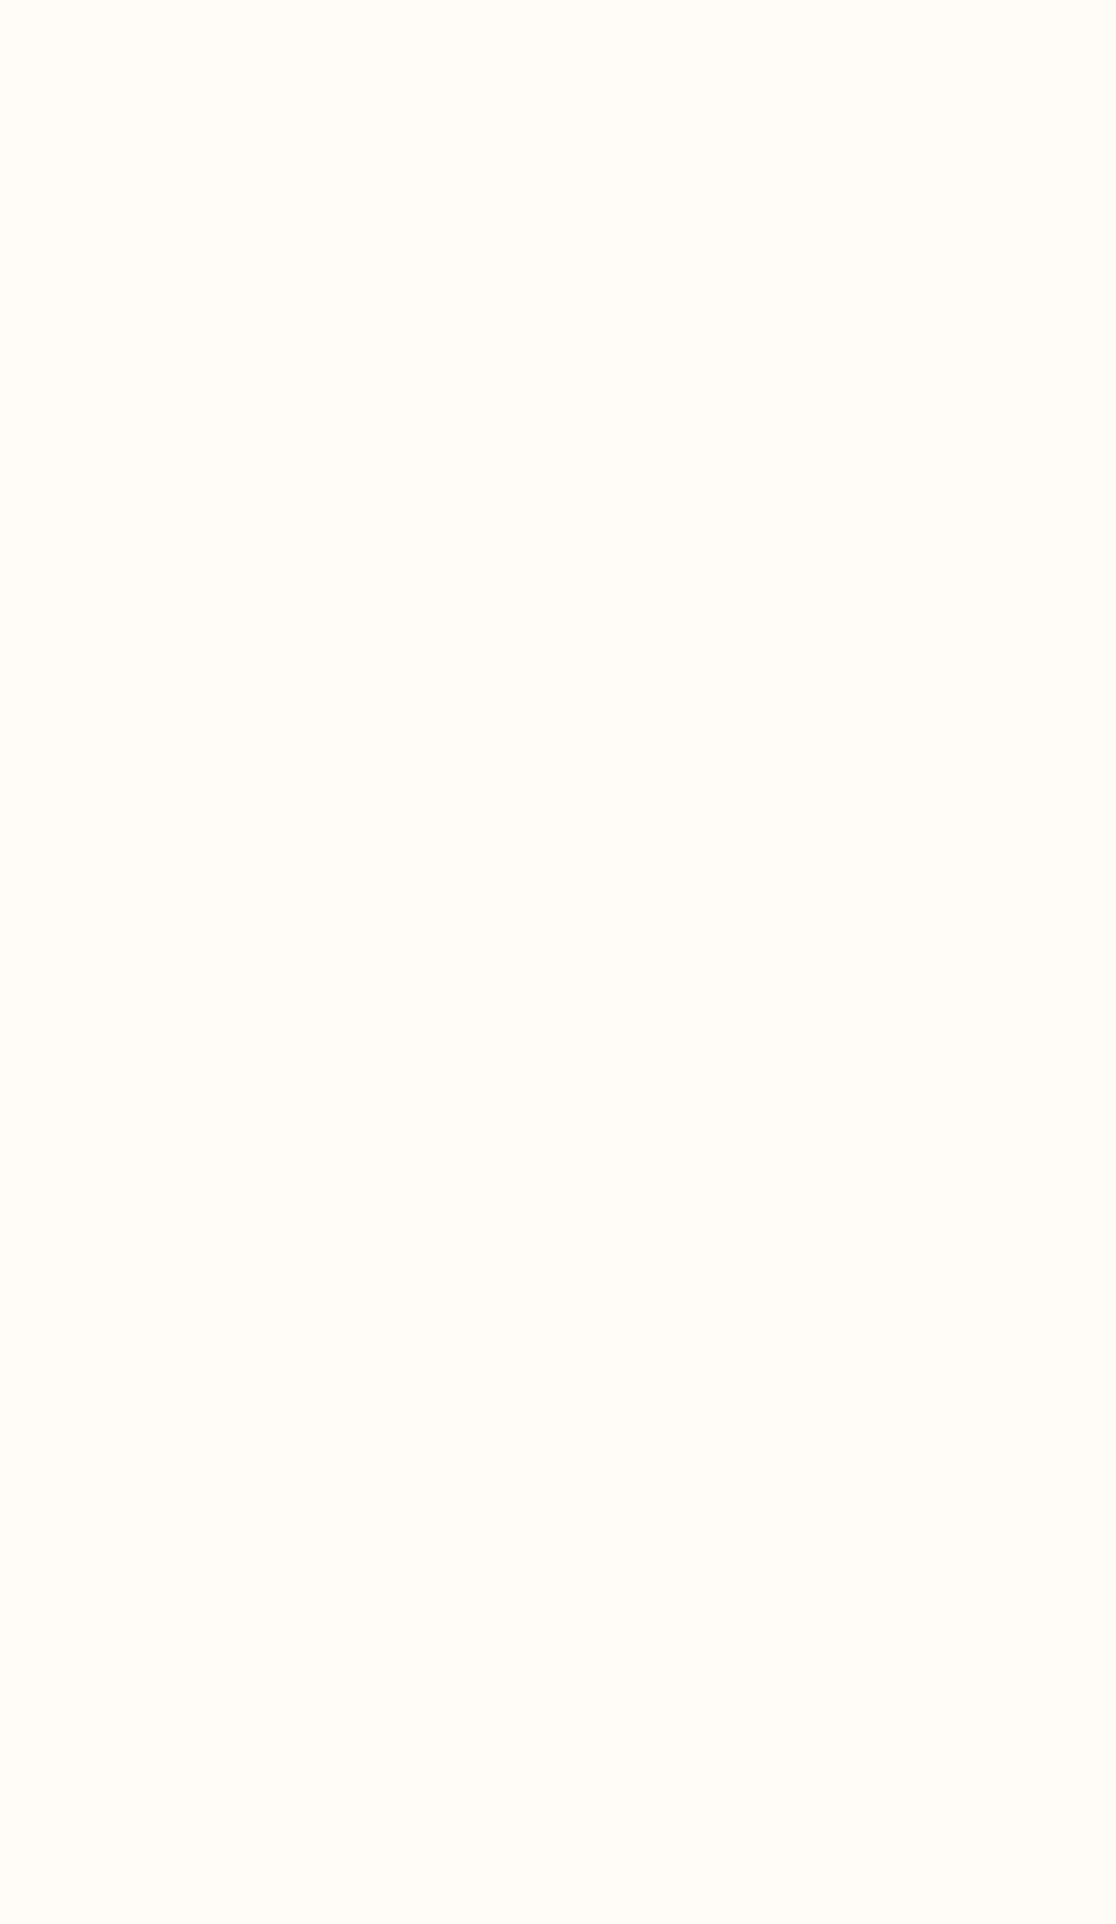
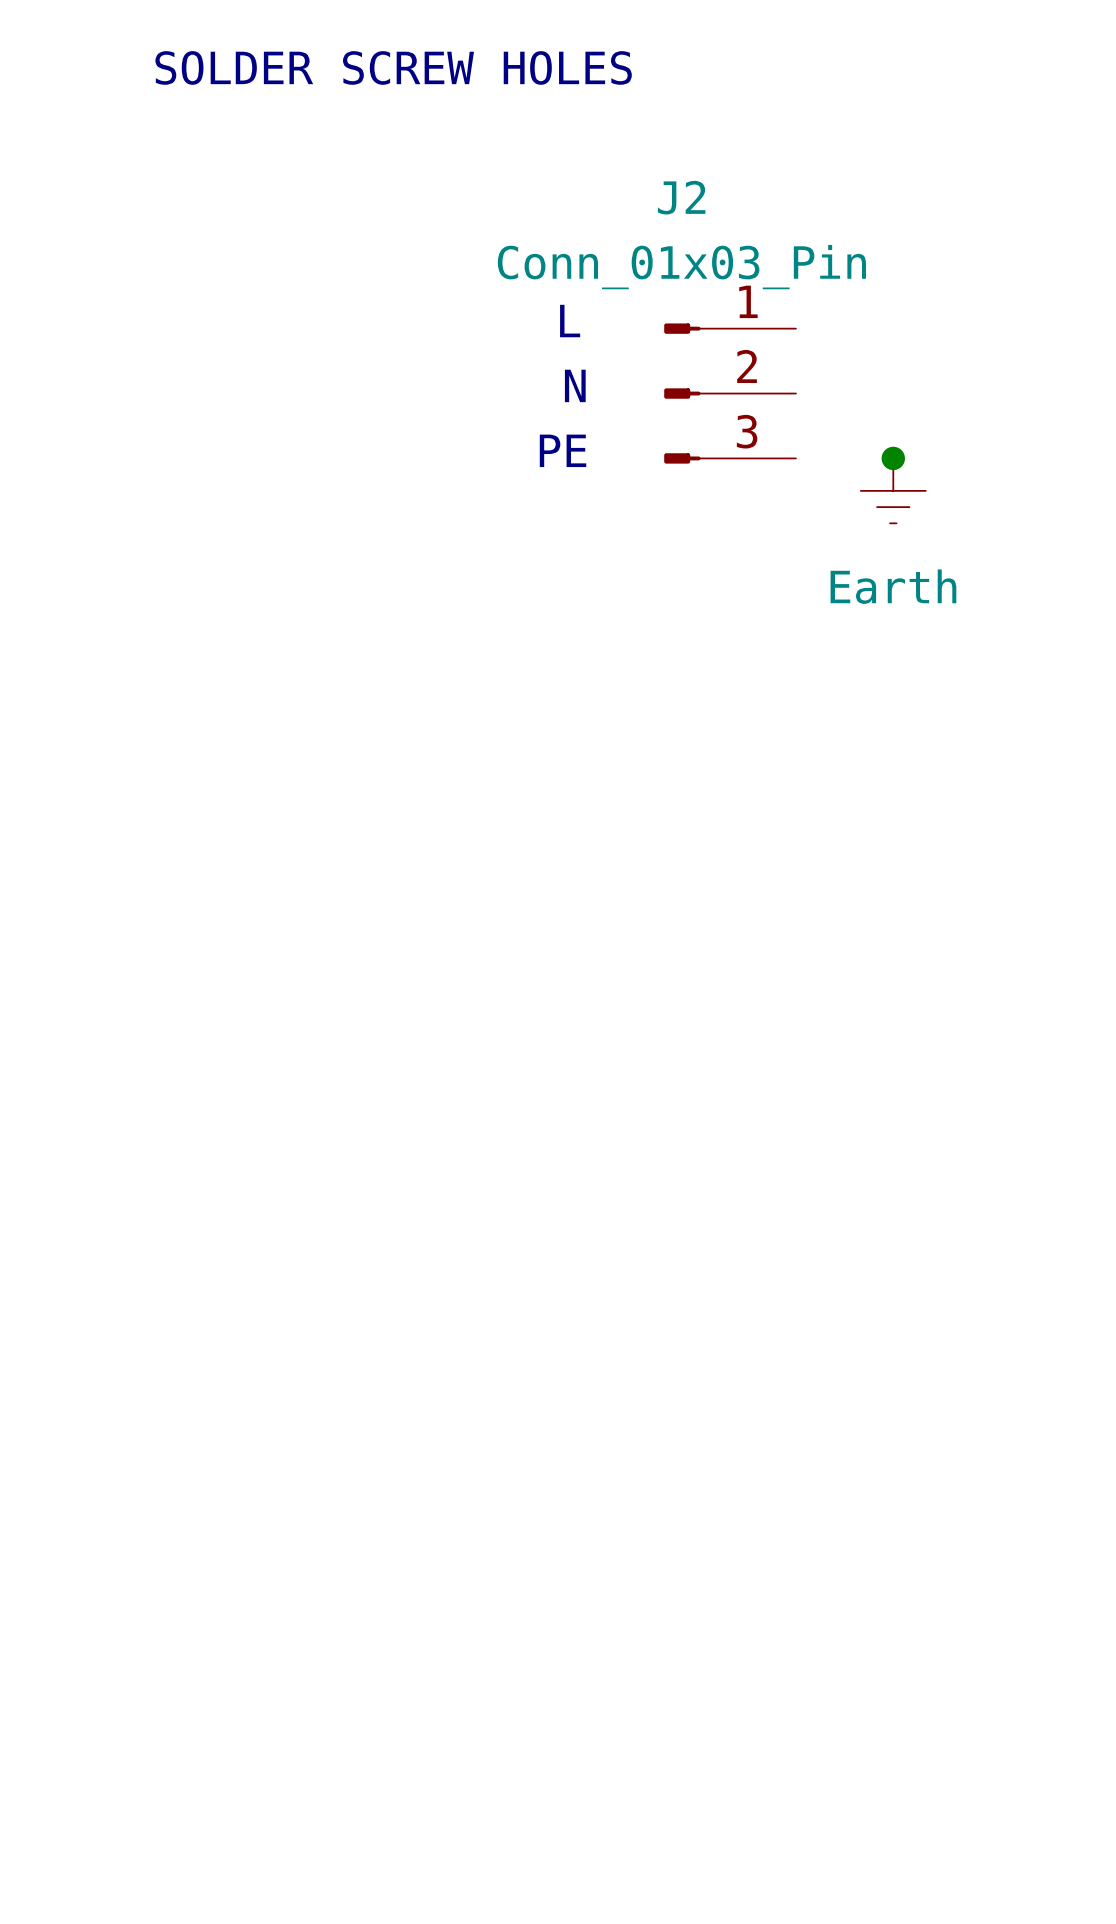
text: none -> SOLDER SCREW HOLES (393, 67)
text: none -> L (570, 321)
text: none -> N (575, 385)
J2: none -> Conn_01x03_Pin (730, 393)
text: none -> PE (563, 450)
junction: none -> (893, 458)
power symbol: none -> Earth (893, 490)

